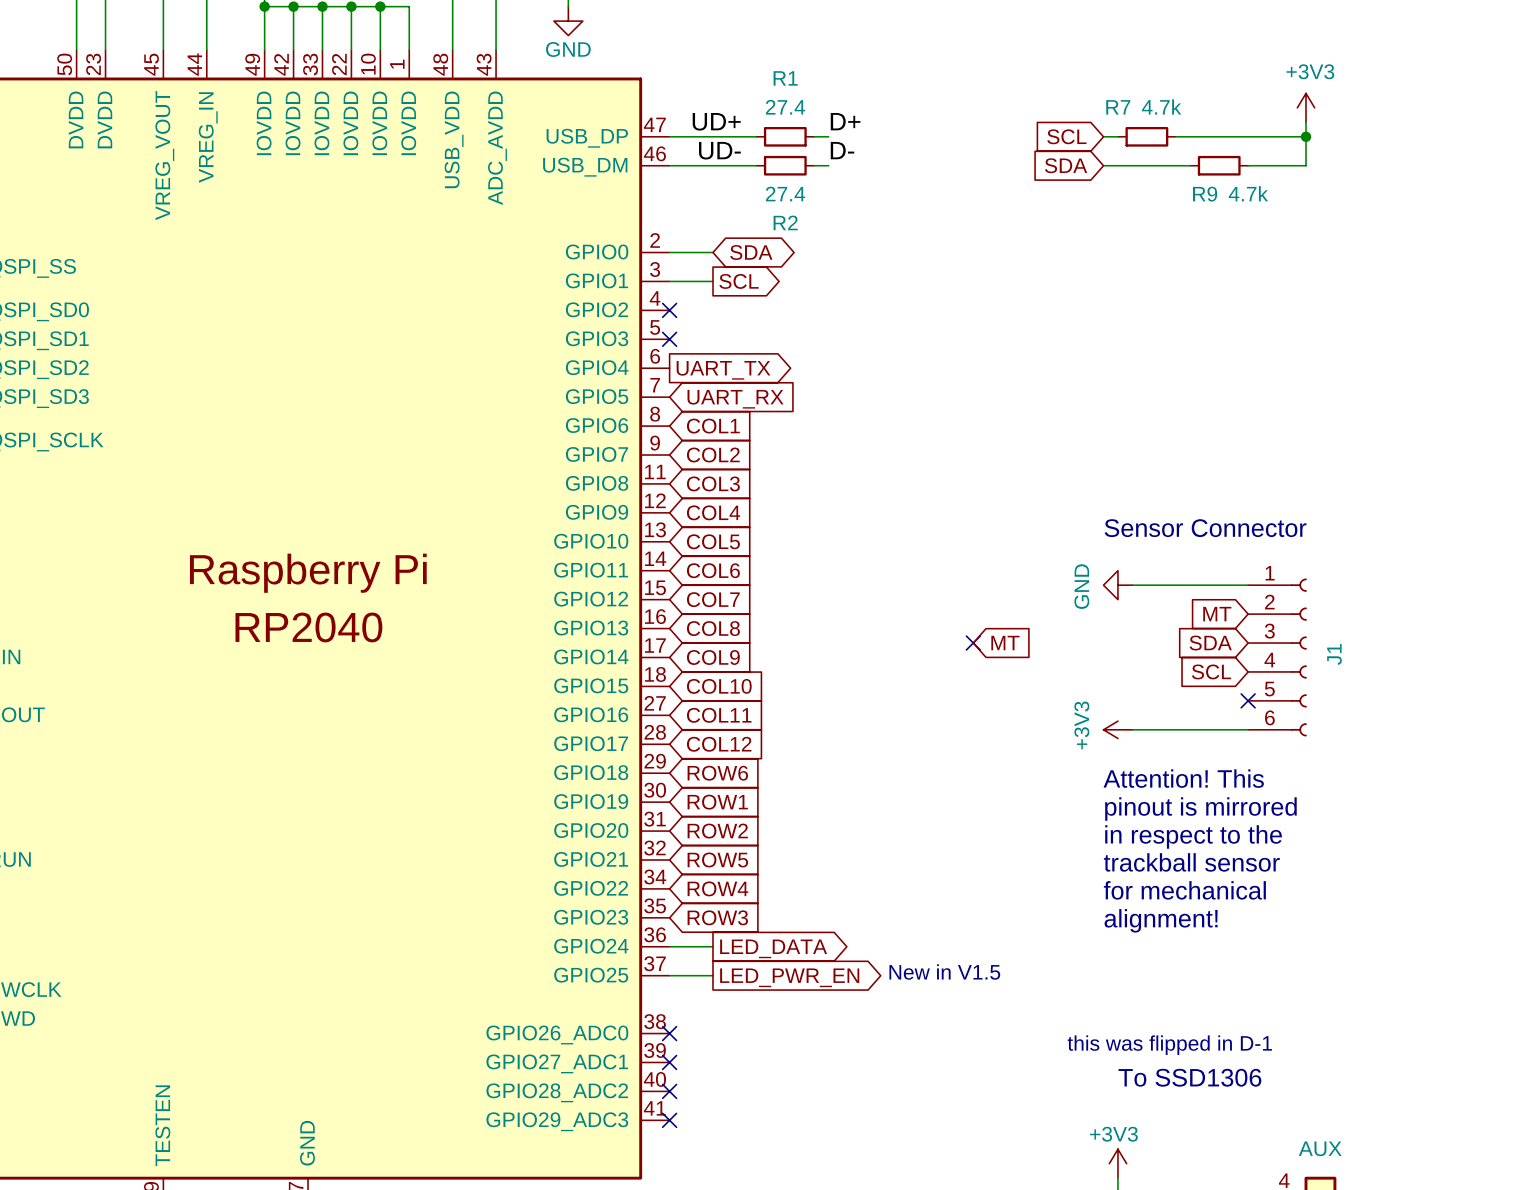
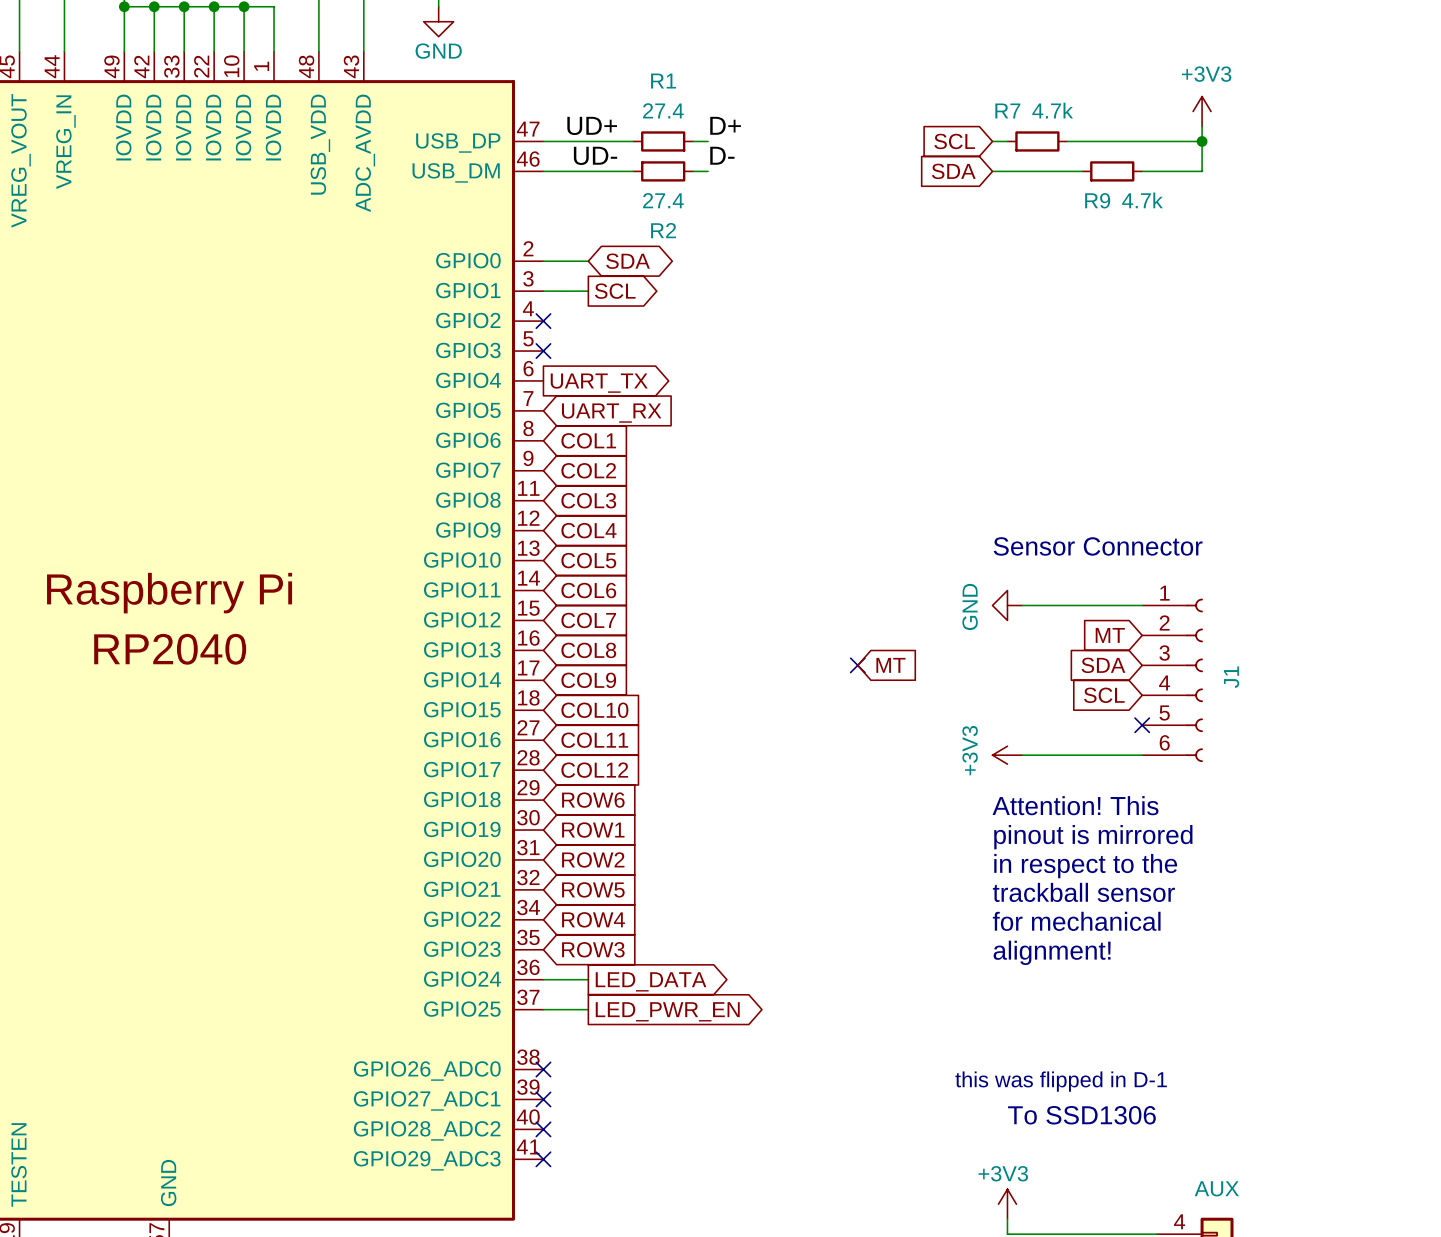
text: New in V1.5 (944, 972) -> none

